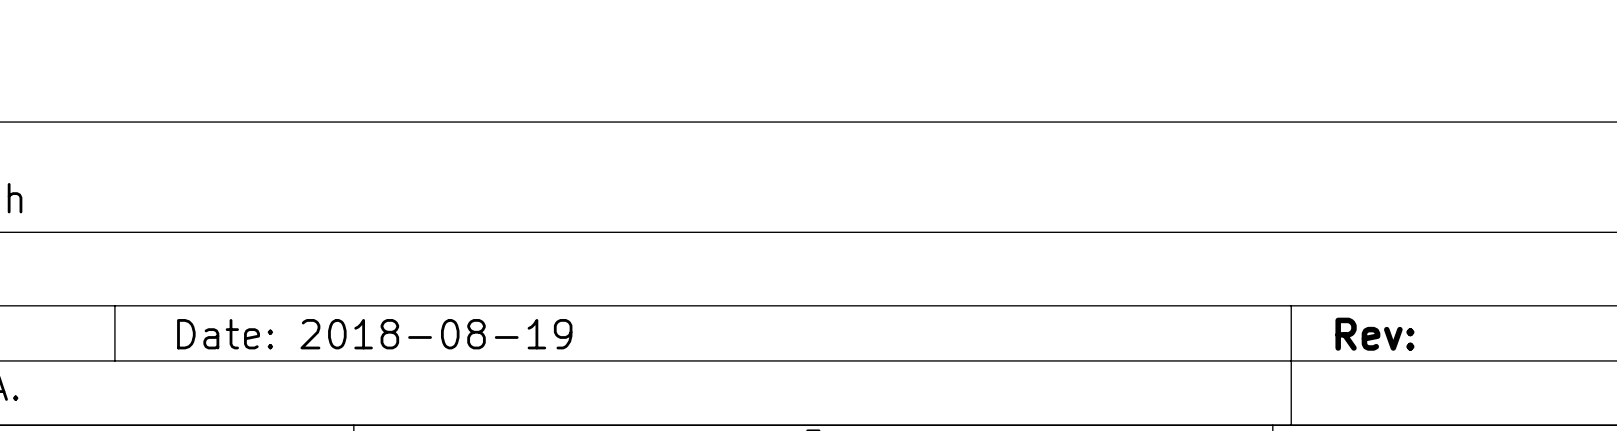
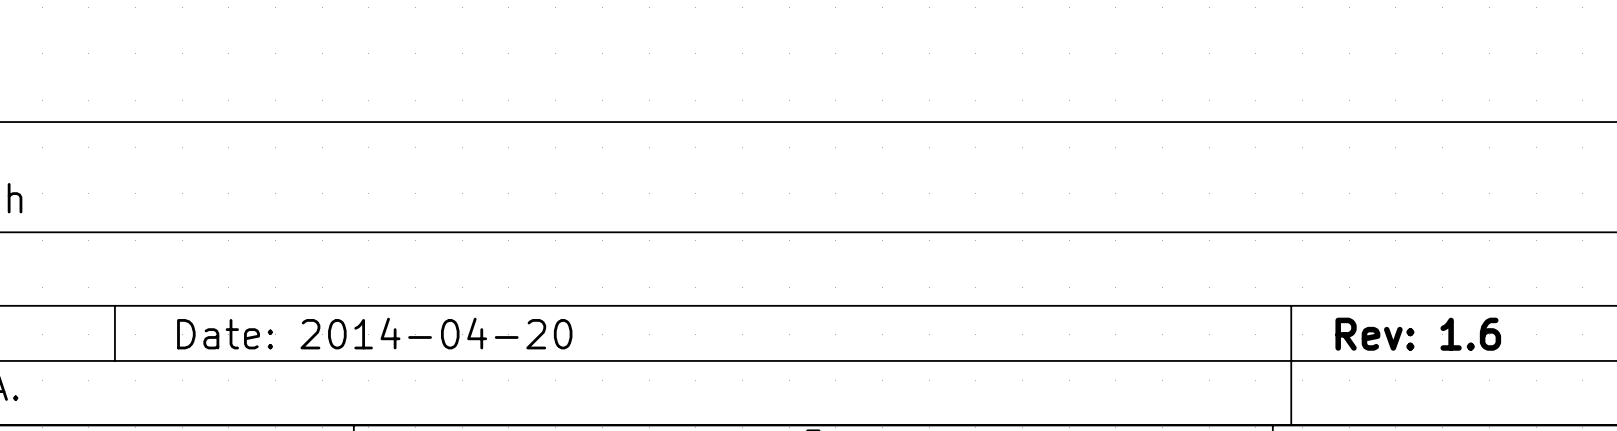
title block: Date: 2018-08-19 (374, 334) -> Date: 2014-04-20 (374, 333)
title block: Rev: (1374, 334) -> Rev: 1.6 (1418, 334)

